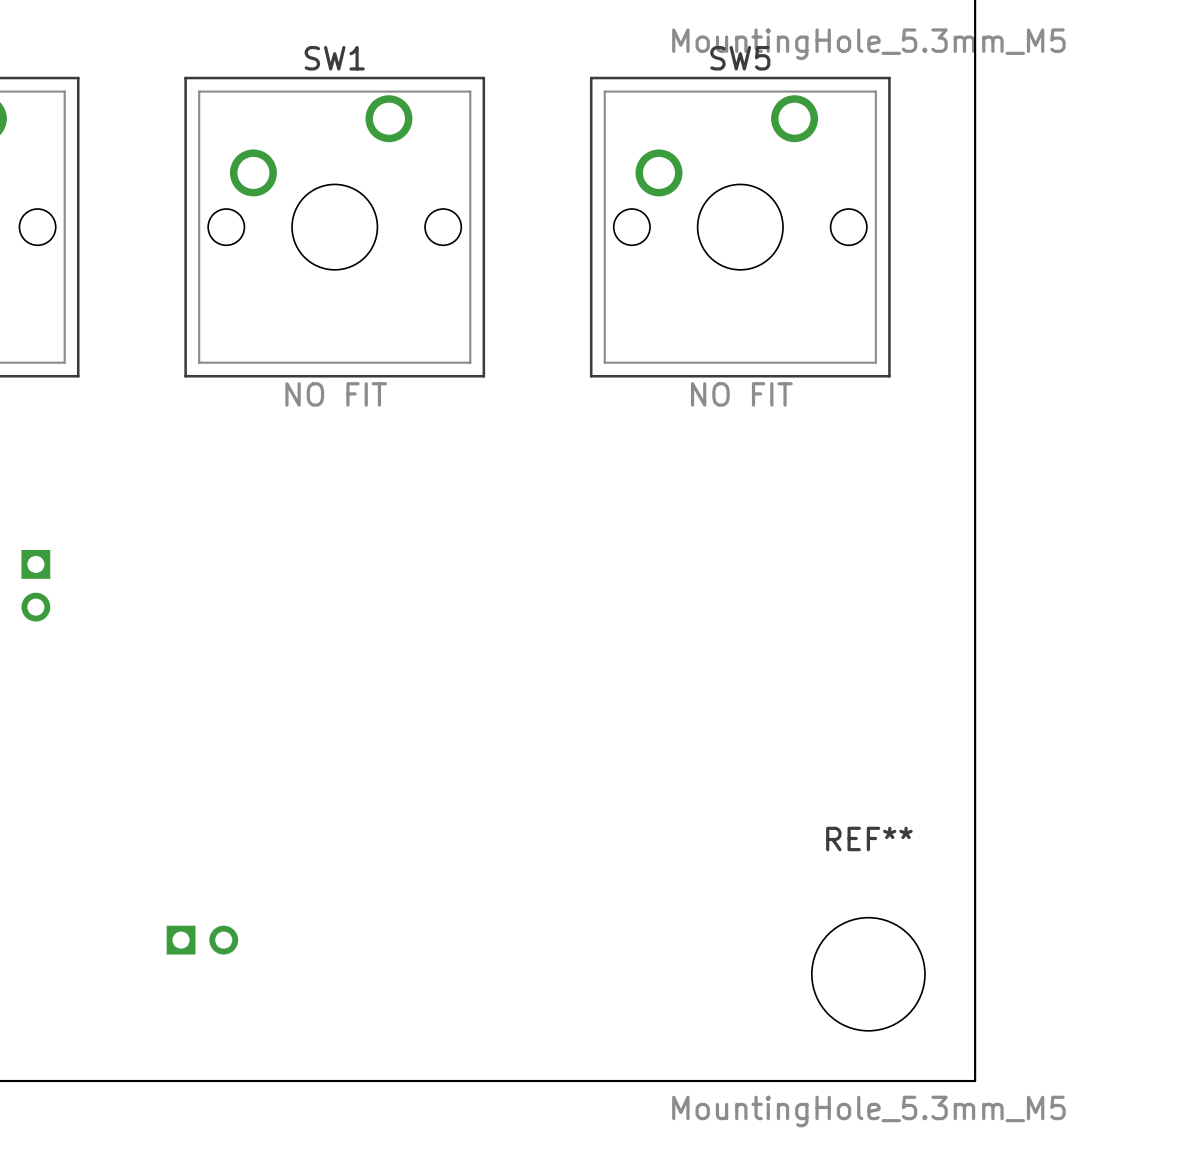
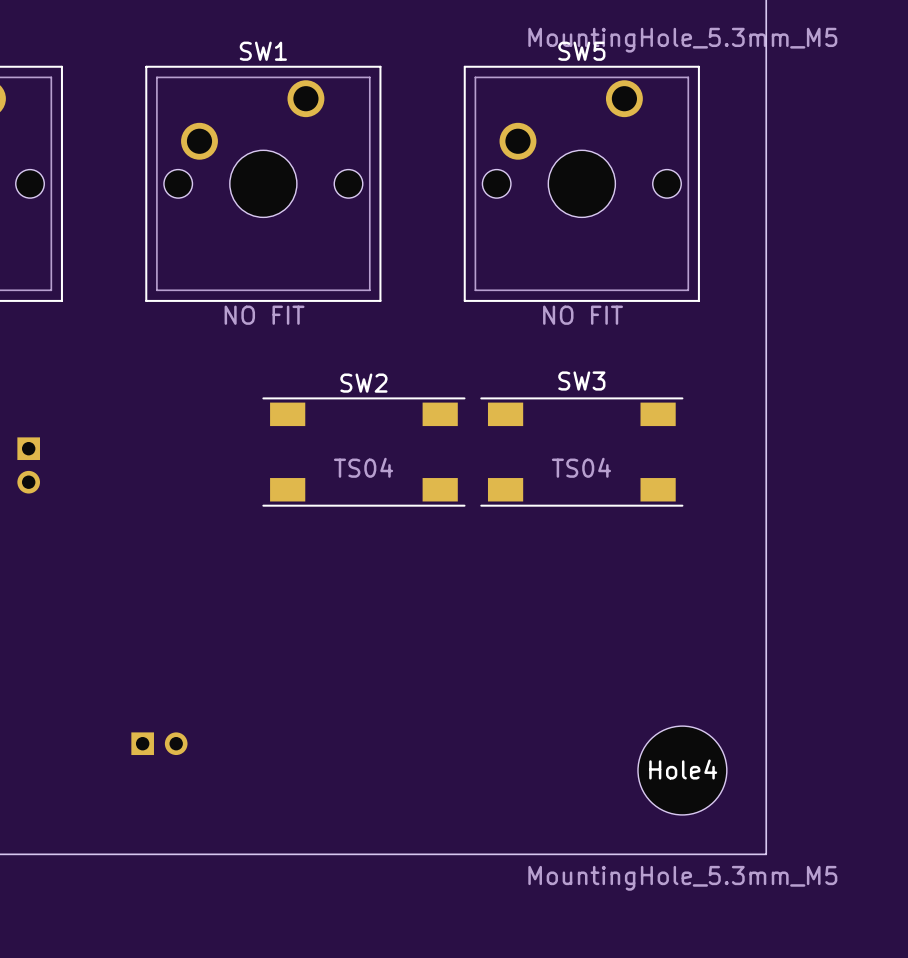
SW2: none -> TS04 (363, 452)
SW3: none -> TS04 (581, 452)
REF** name: REF** (869, 838) -> Hole4 (683, 769)

